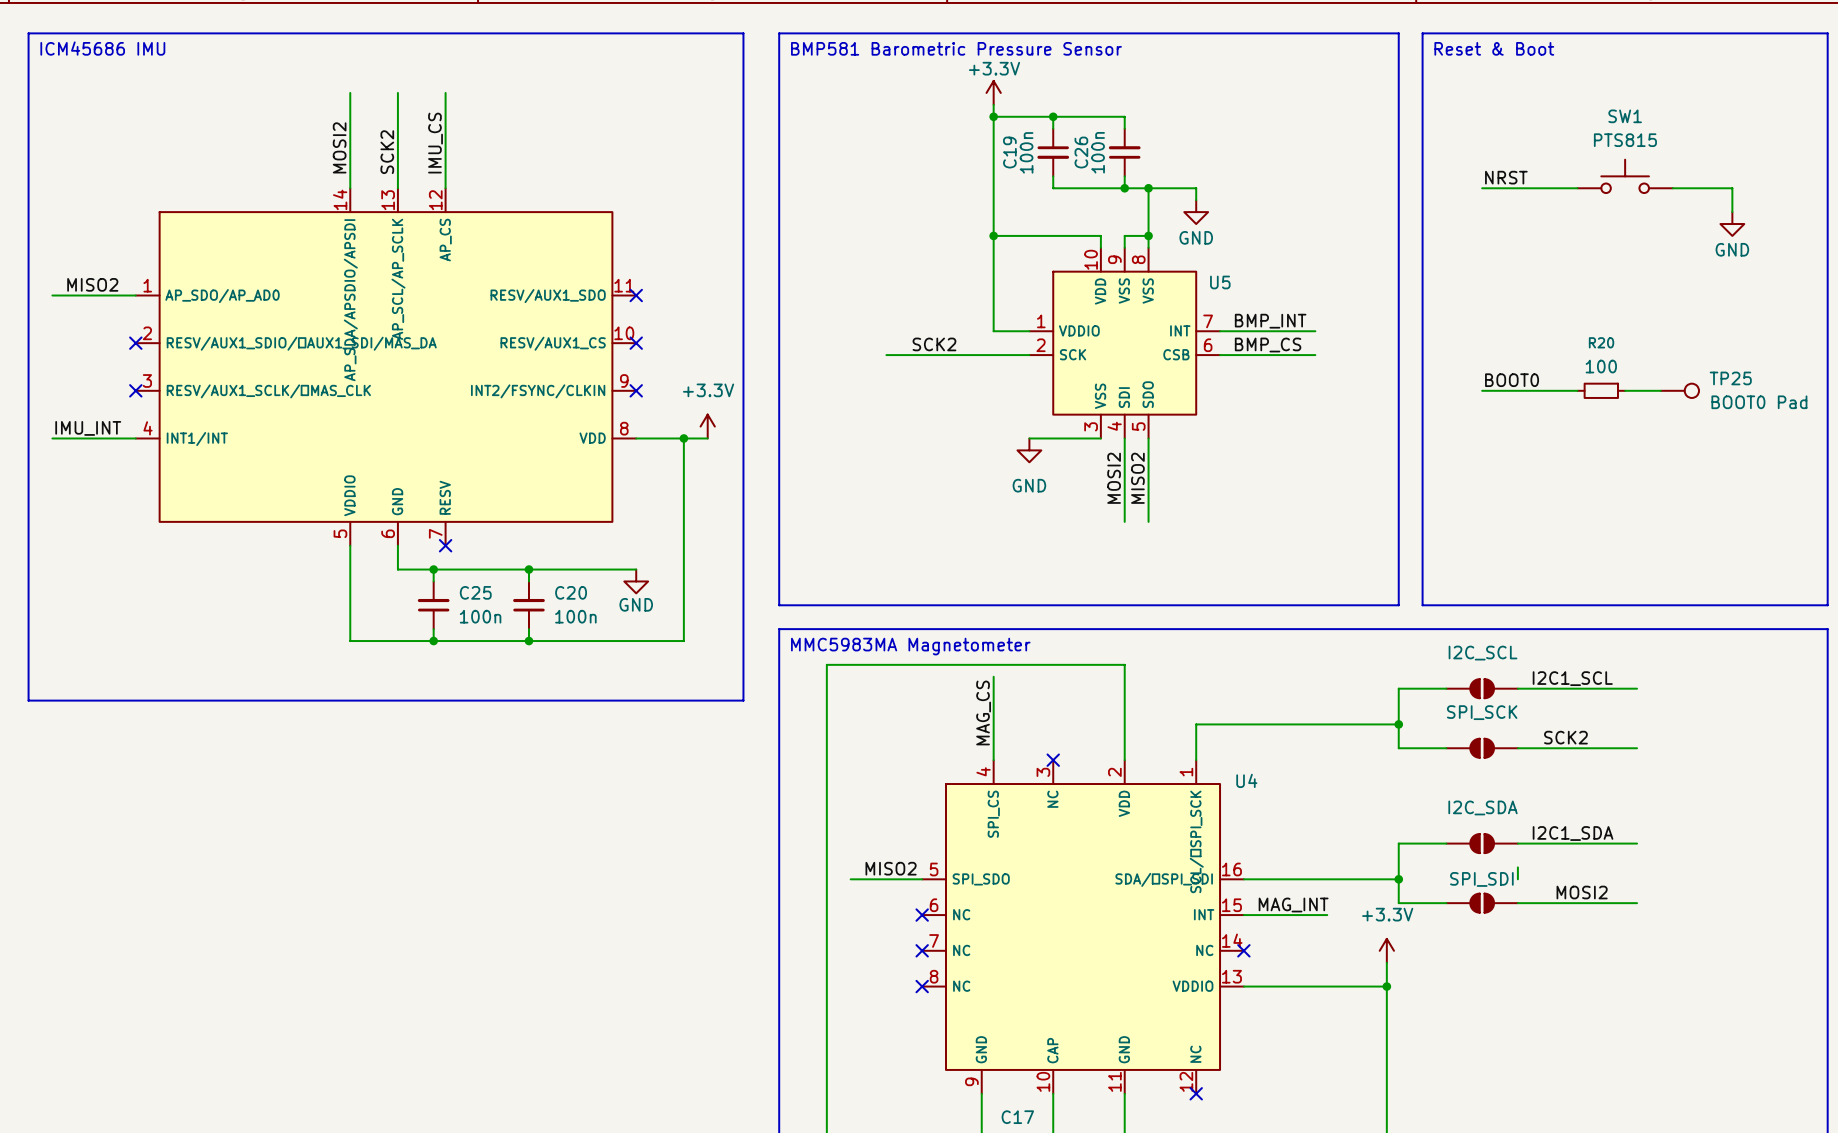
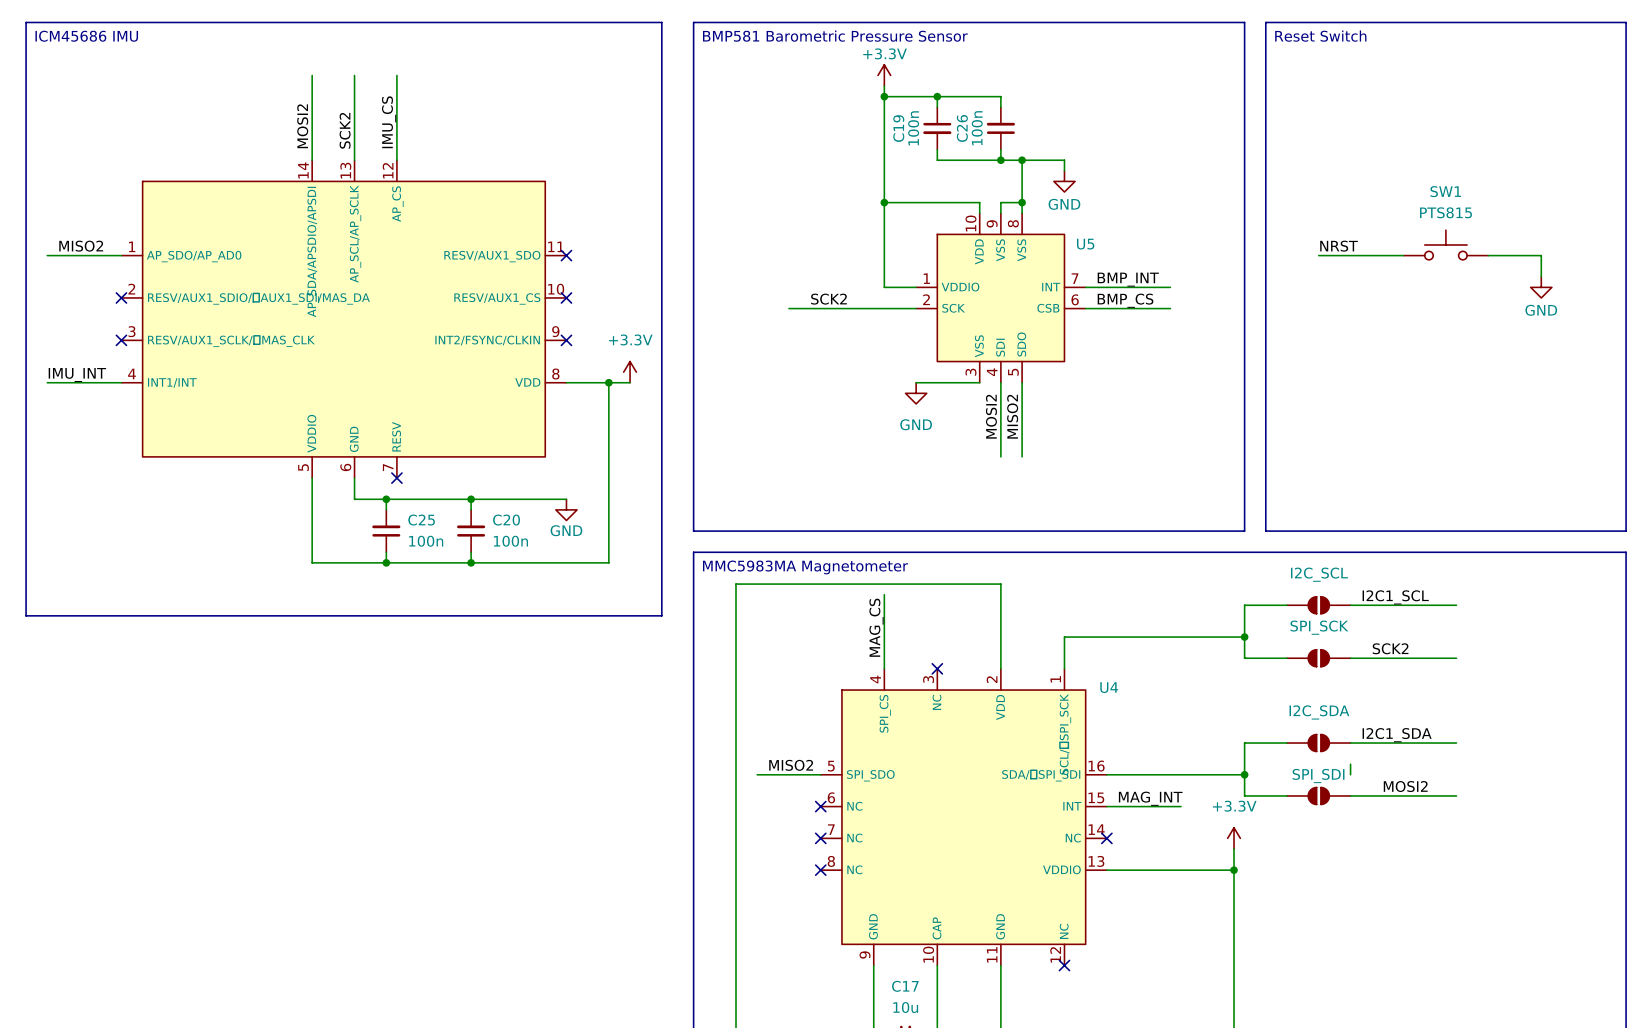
text: Reset & Boot (1494, 48) -> Reset Switch (1320, 36)
SW1 position: (1625, 176) -> (1445, 244)
label position: NRST (1506, 177) -> NRST (1339, 246)
wire: (1482, 188) (1577, 188) -> none
wire: (1672, 188) (1732, 188) (1732, 212) -> (1488, 255) (1541, 255) (1541, 276)
power symbol position: GND (1732, 224) -> GND (1541, 287)
label: BOOT0 (1512, 380) -> none
wire: (1482, 390) (1577, 390) -> (1318, 255) (1403, 255)
R20: 100 (1601, 390) -> none
wire: (1625, 390) (1660, 390) -> none
TP25: BOOT0 Pad (1679, 390) -> none

